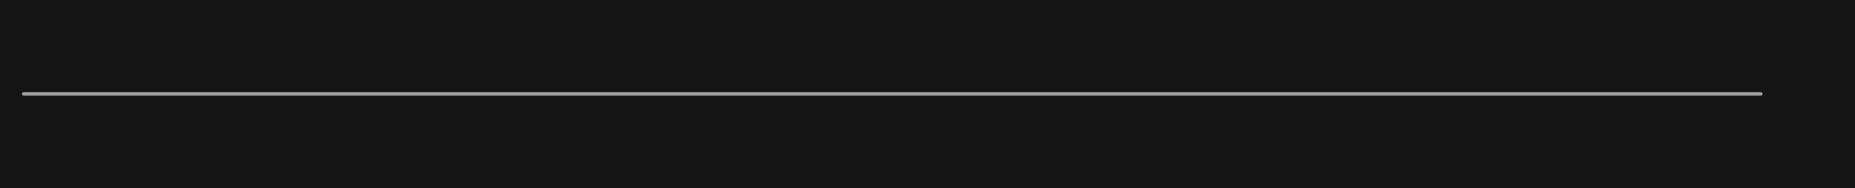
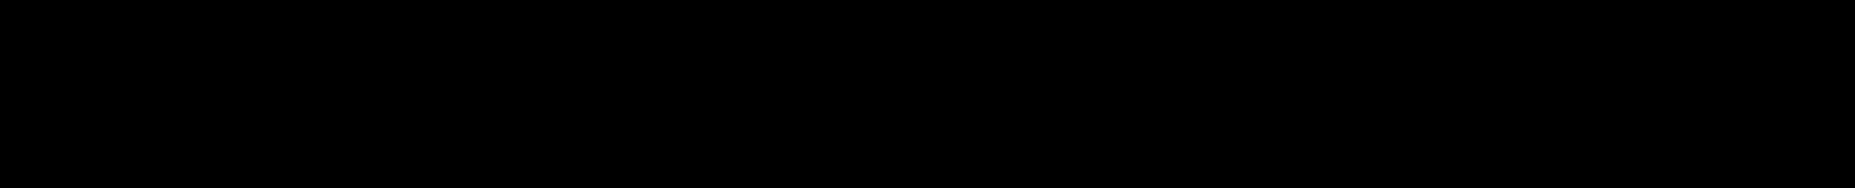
board edge: (23, 93) (1760, 93) -> none

